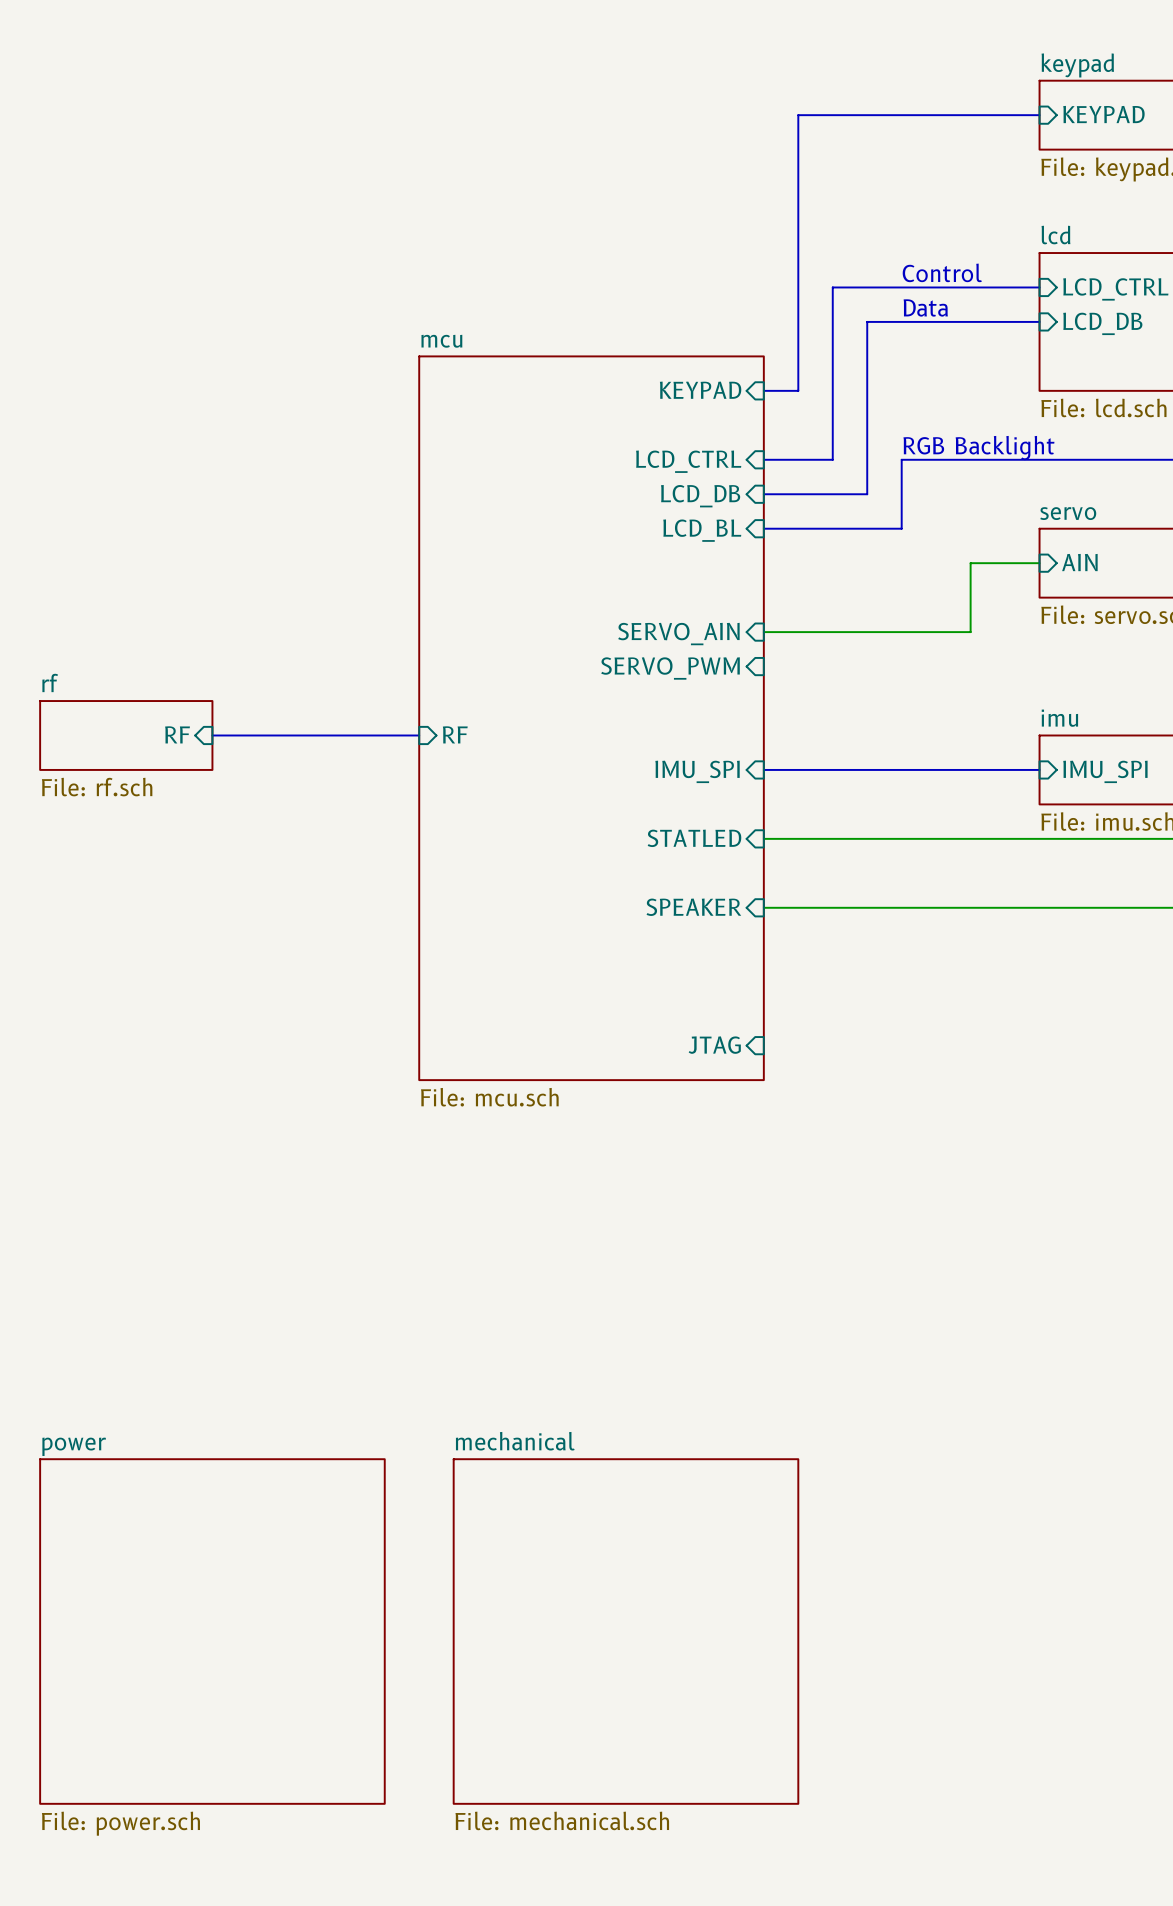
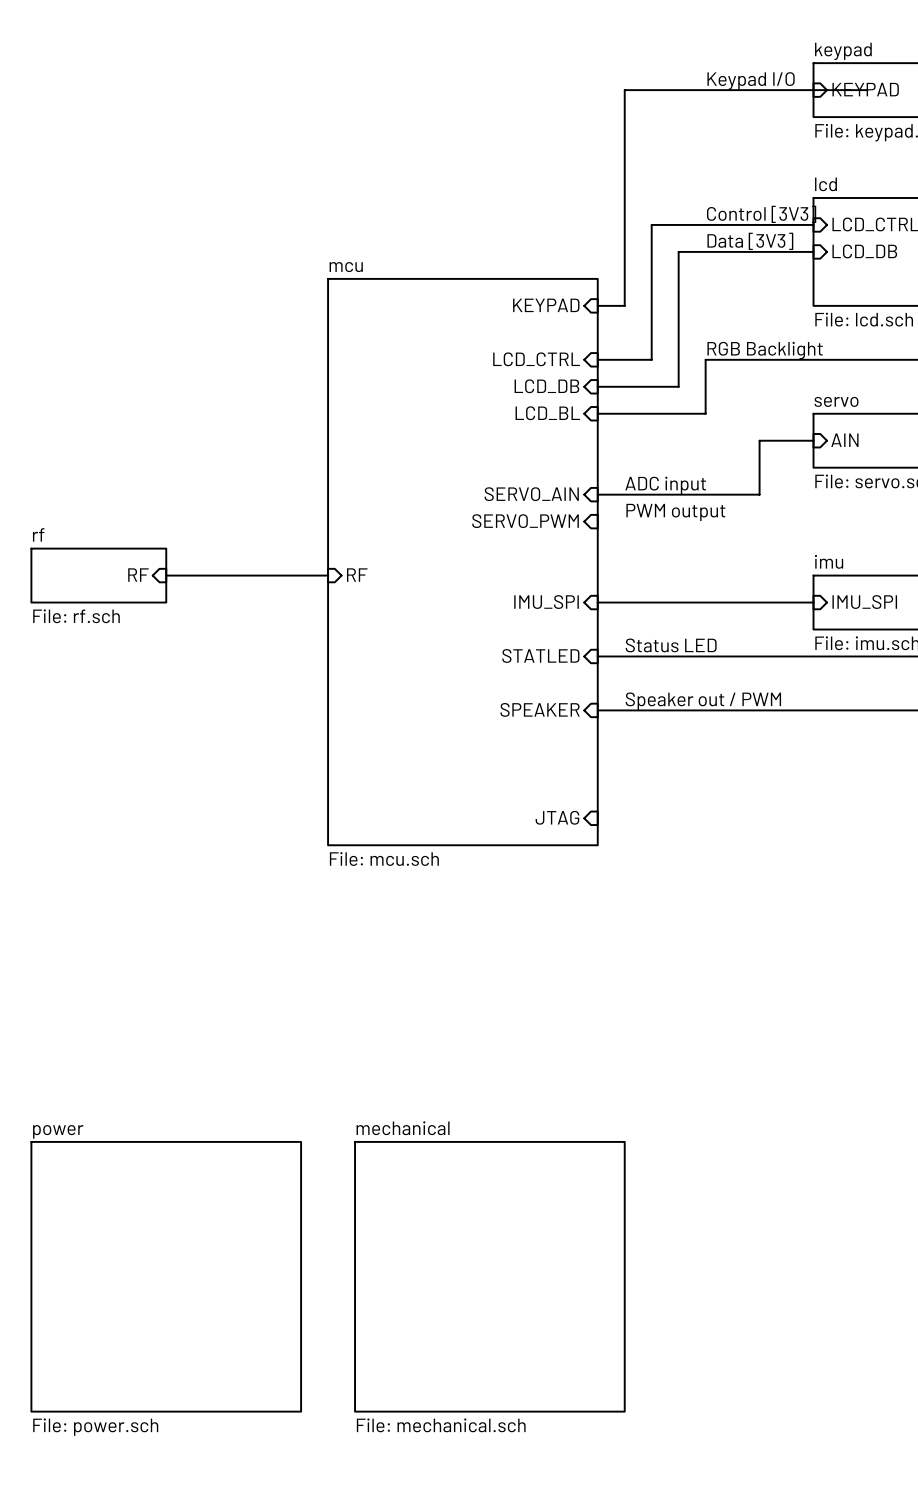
text: none -> Keypad I/O (751, 80)
bus: none -> (813, 90) (867, 90)
text: Control (942, 272) -> Control [3V3] (761, 214)
text: Data (925, 307) -> Data [3V3] (750, 241)
text: none -> ADC input (665, 485)
text: none -> PWM output (675, 512)
text: none -> Status LED (671, 645)
text: none -> Speaker out / PWM (703, 701)

